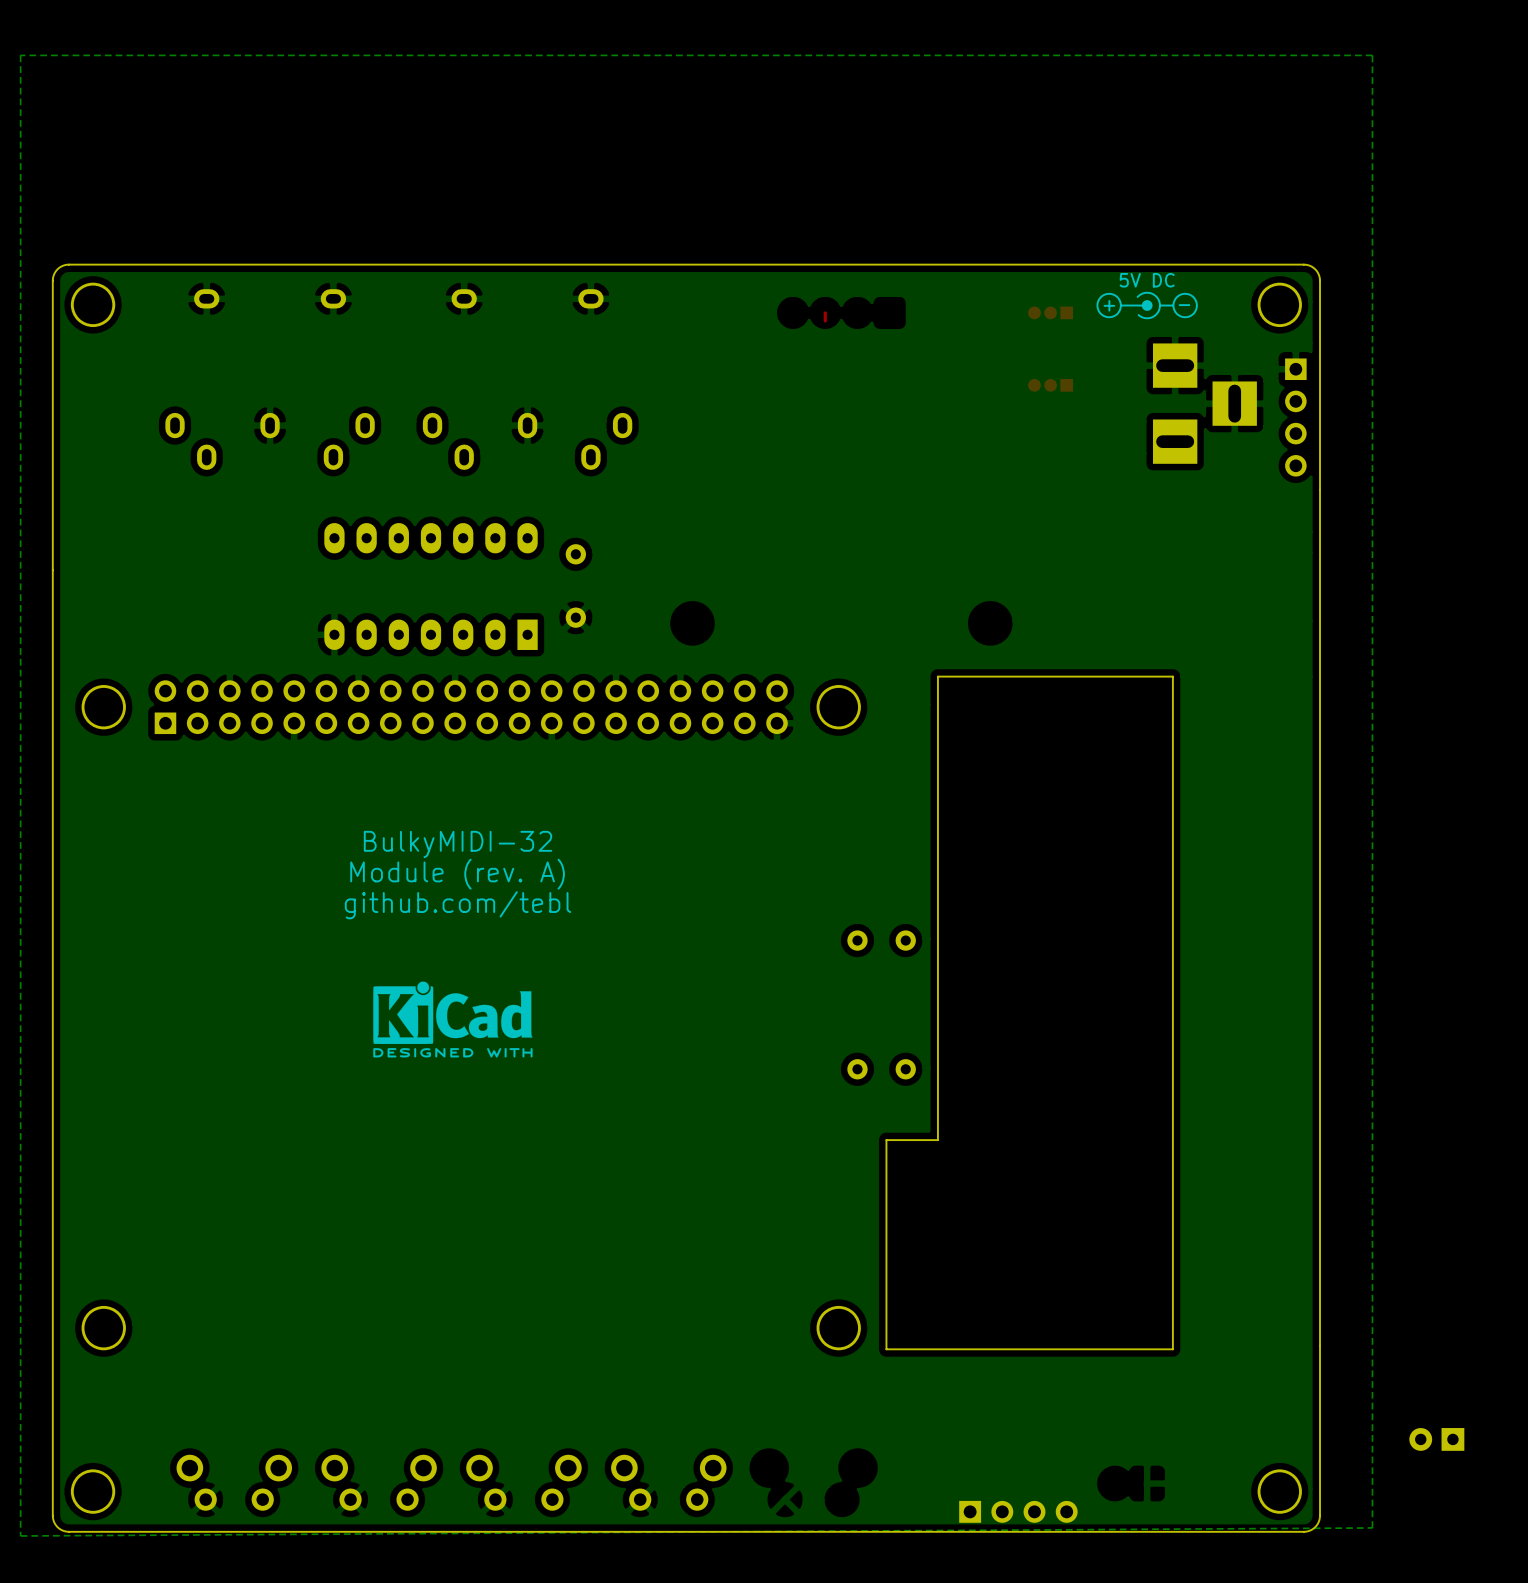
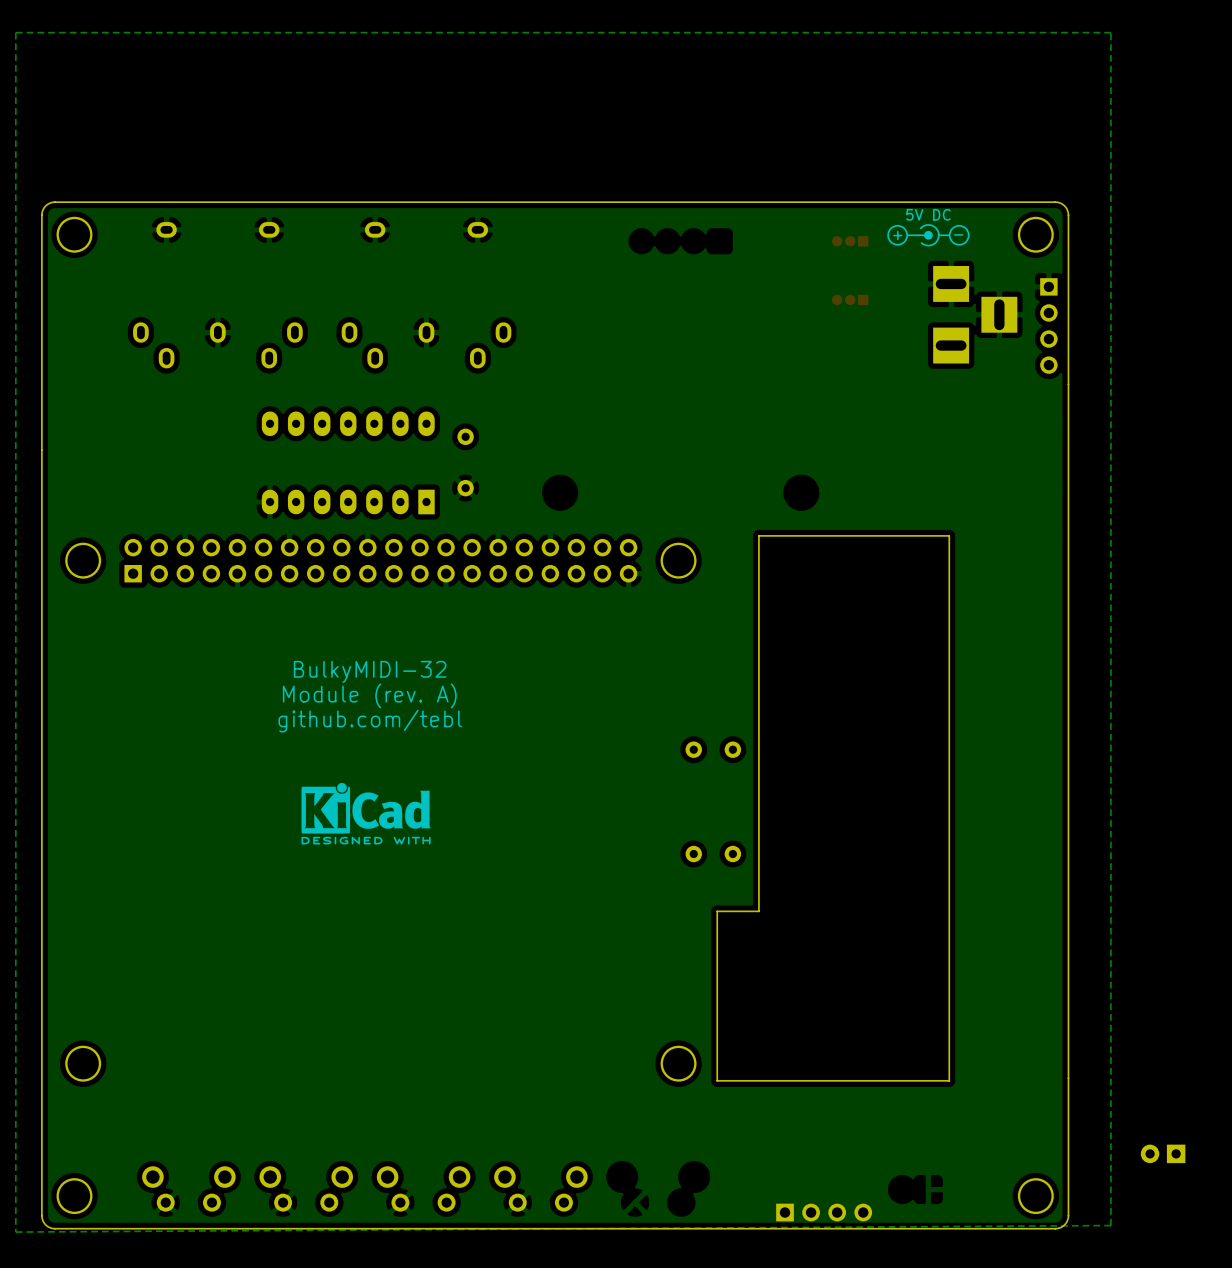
top track: (825, 312) (825, 320) -> none

